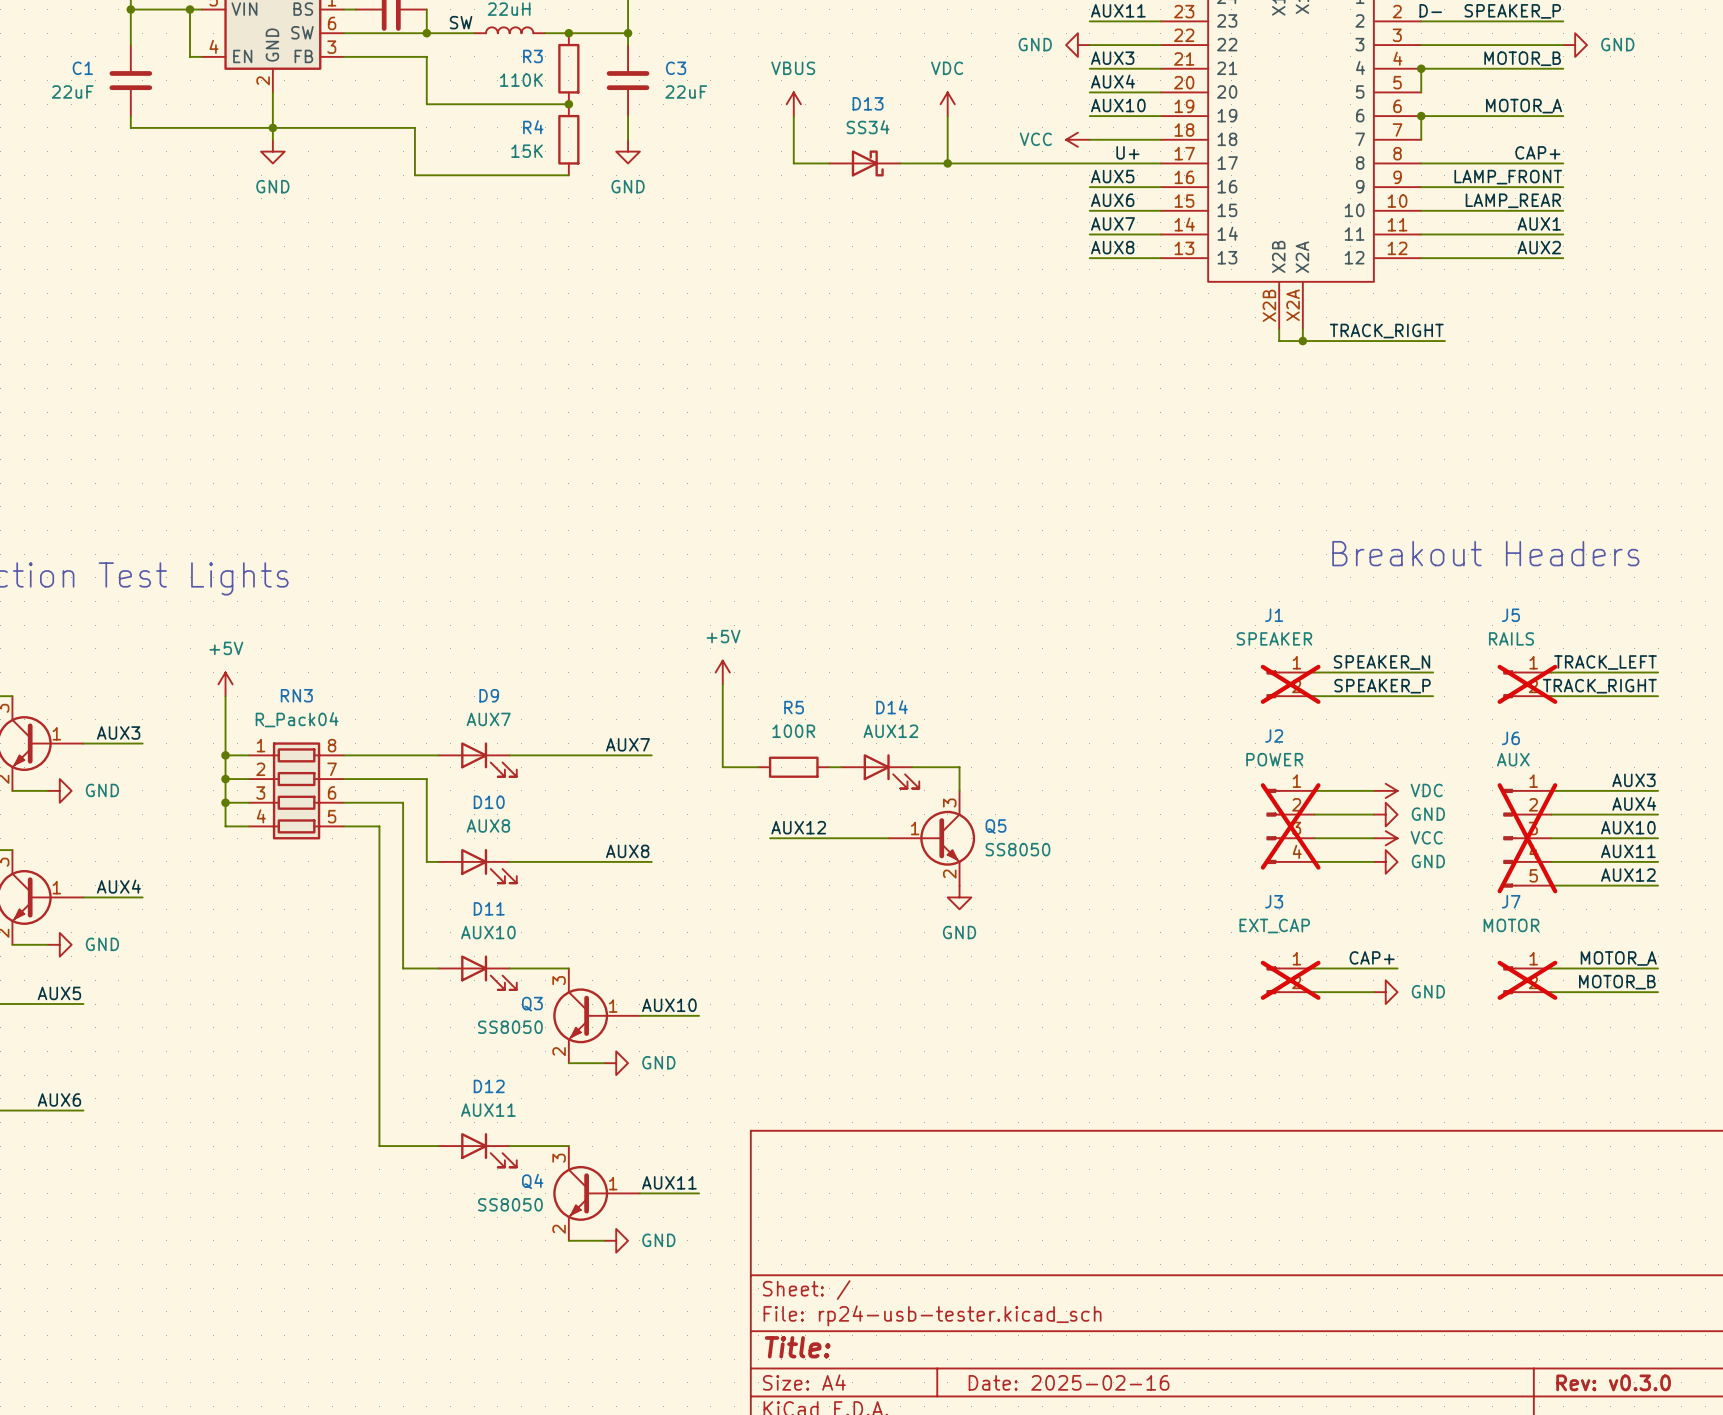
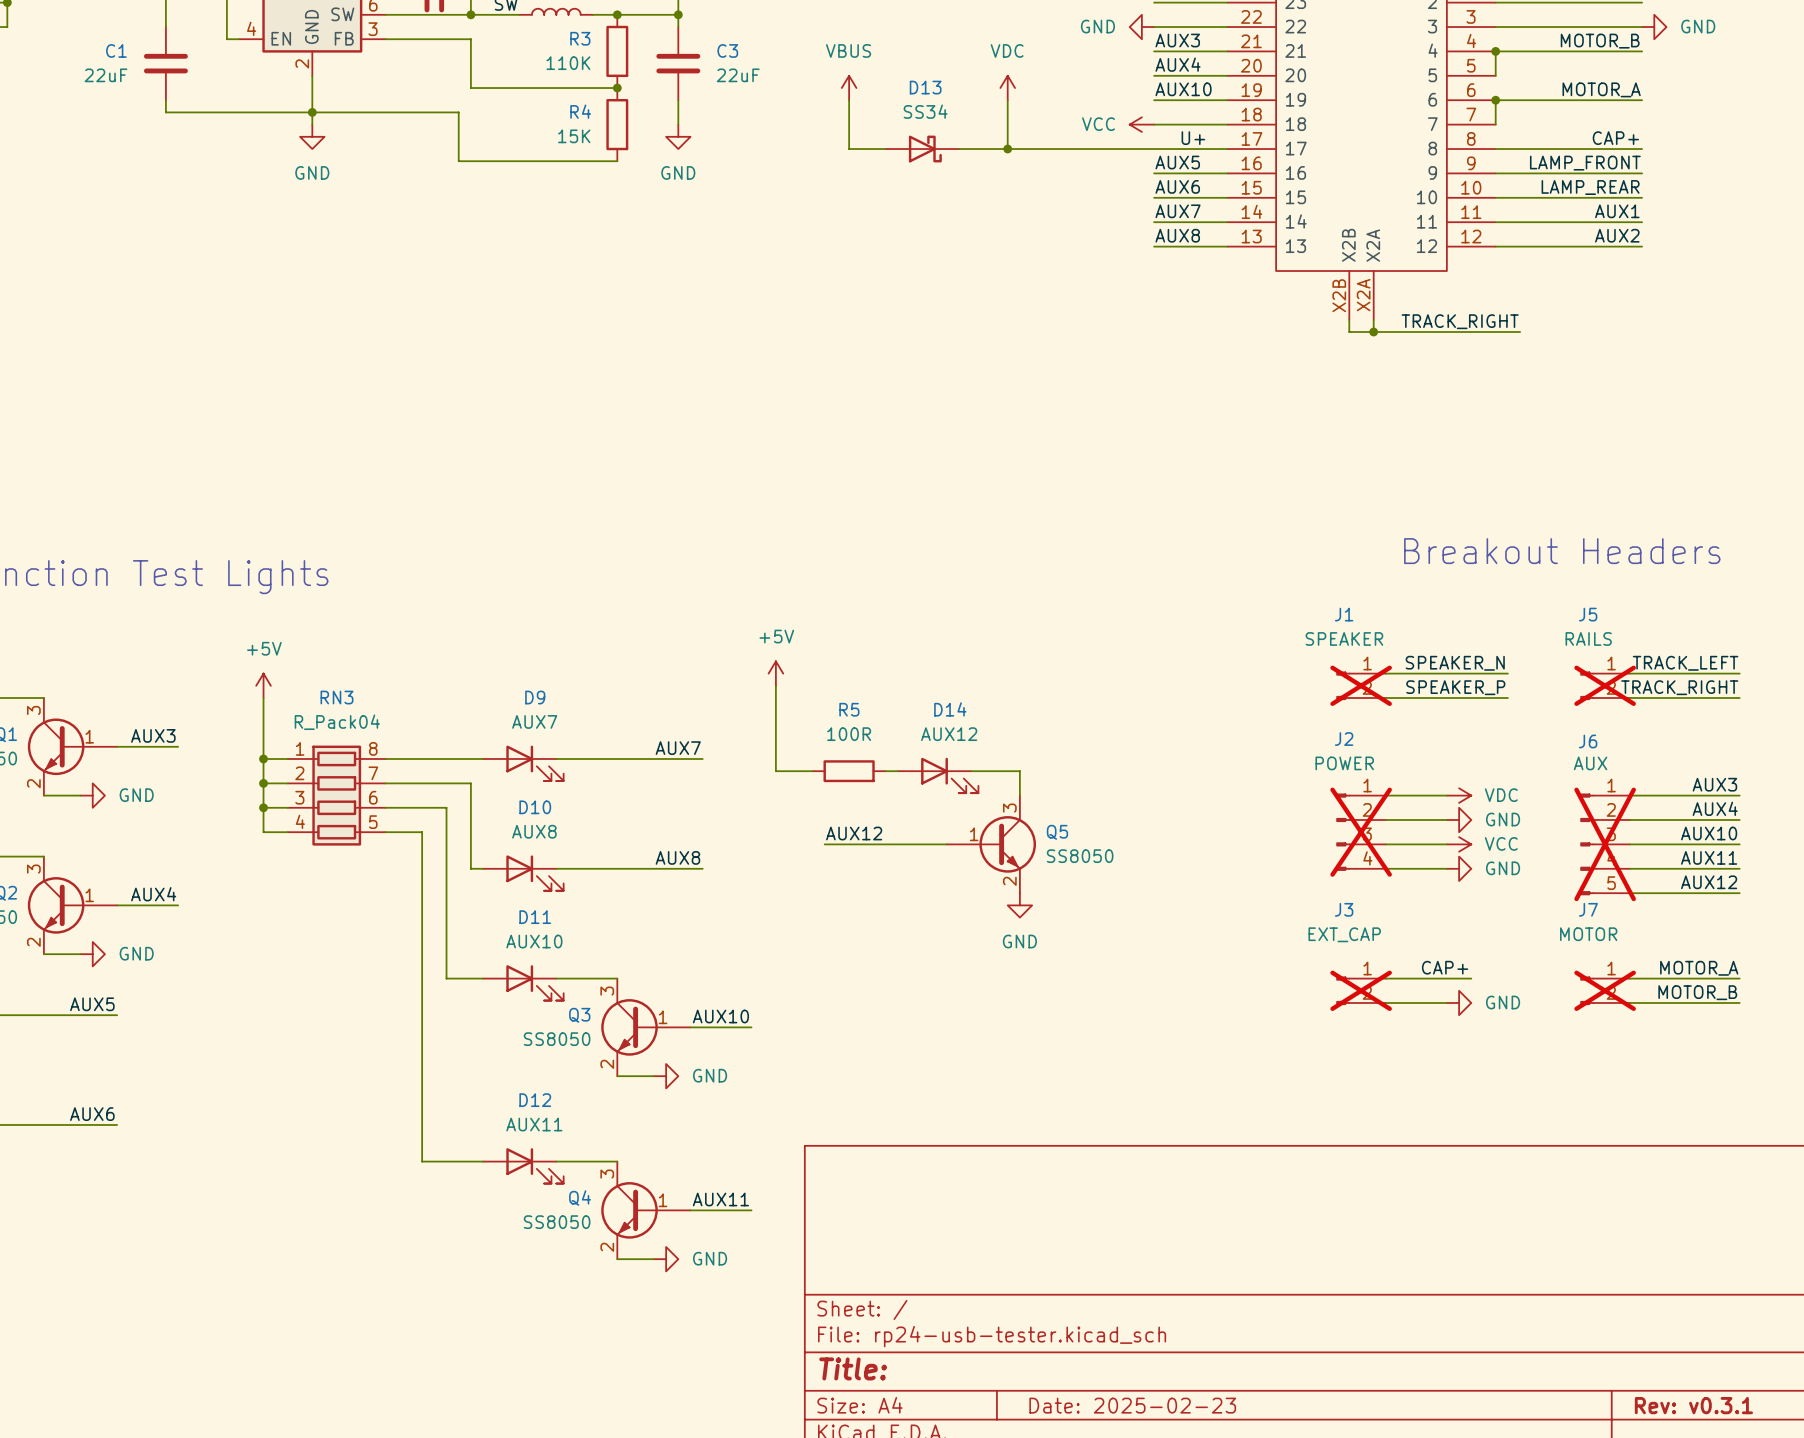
title block: Date: 2025-02-16 (1069, 1382) -> Date: 2025-02-23 (1132, 1405)
title block: Rev: v0.3.0 (1613, 1382) -> Rev: v0.3.1 (1693, 1405)

